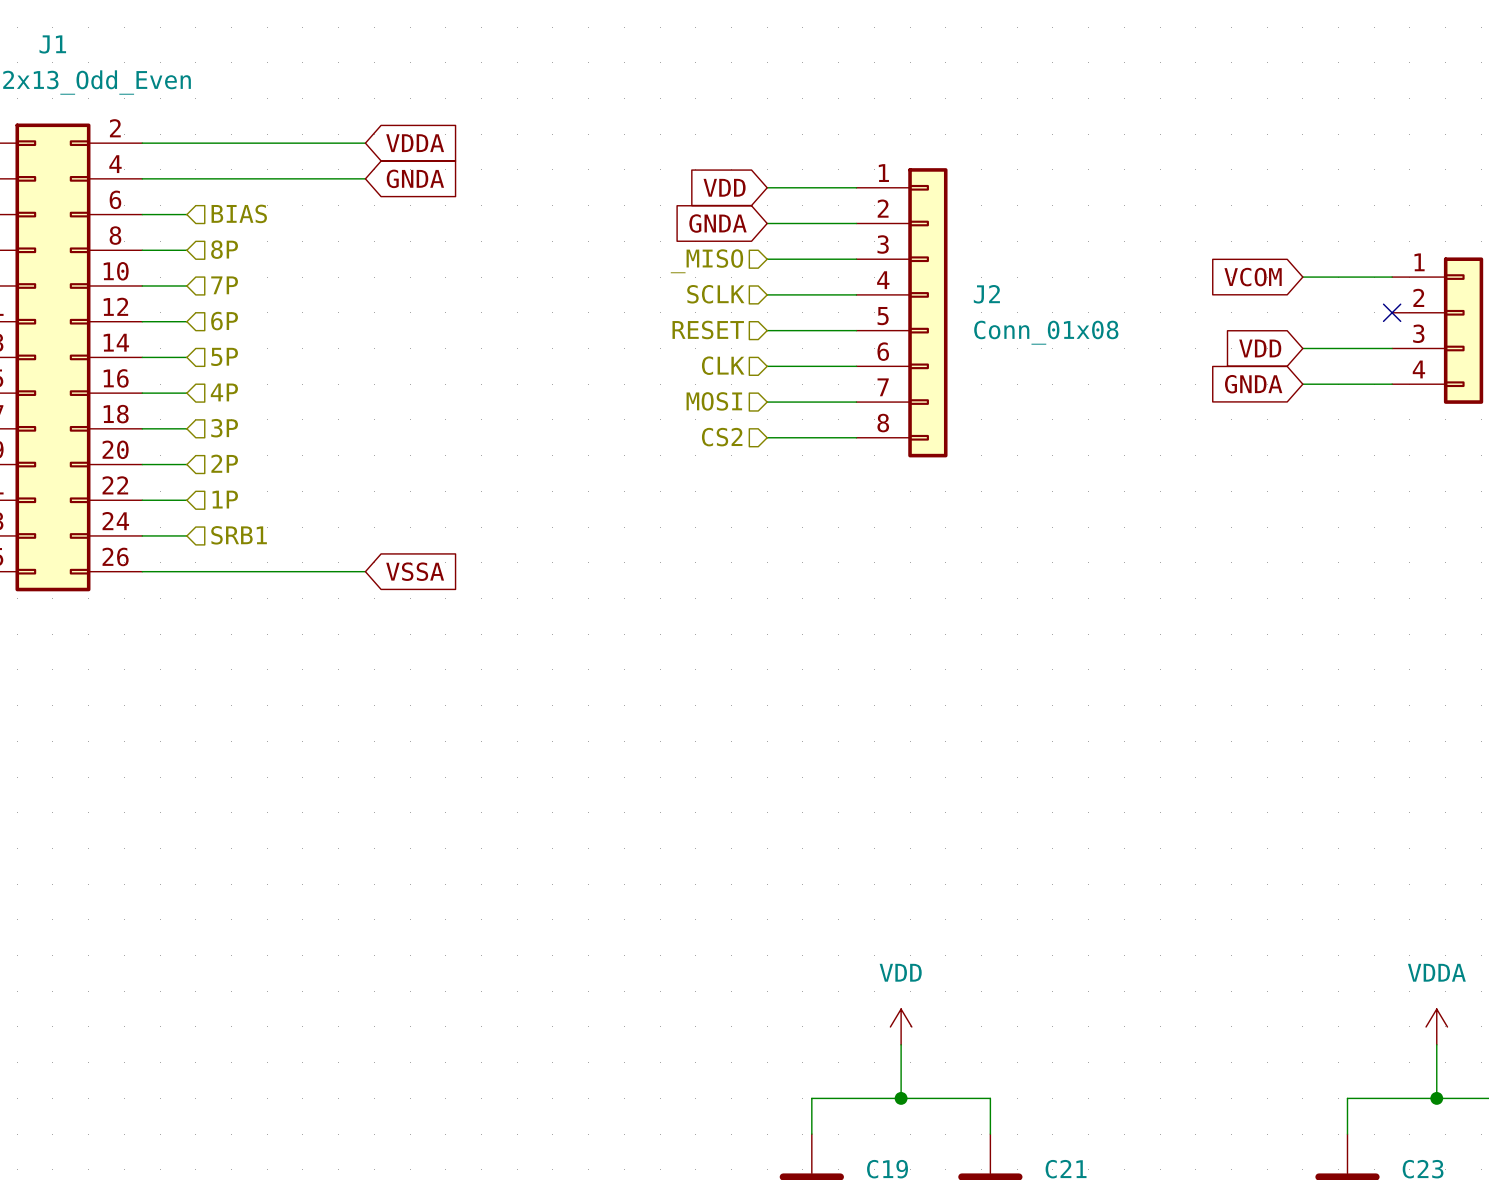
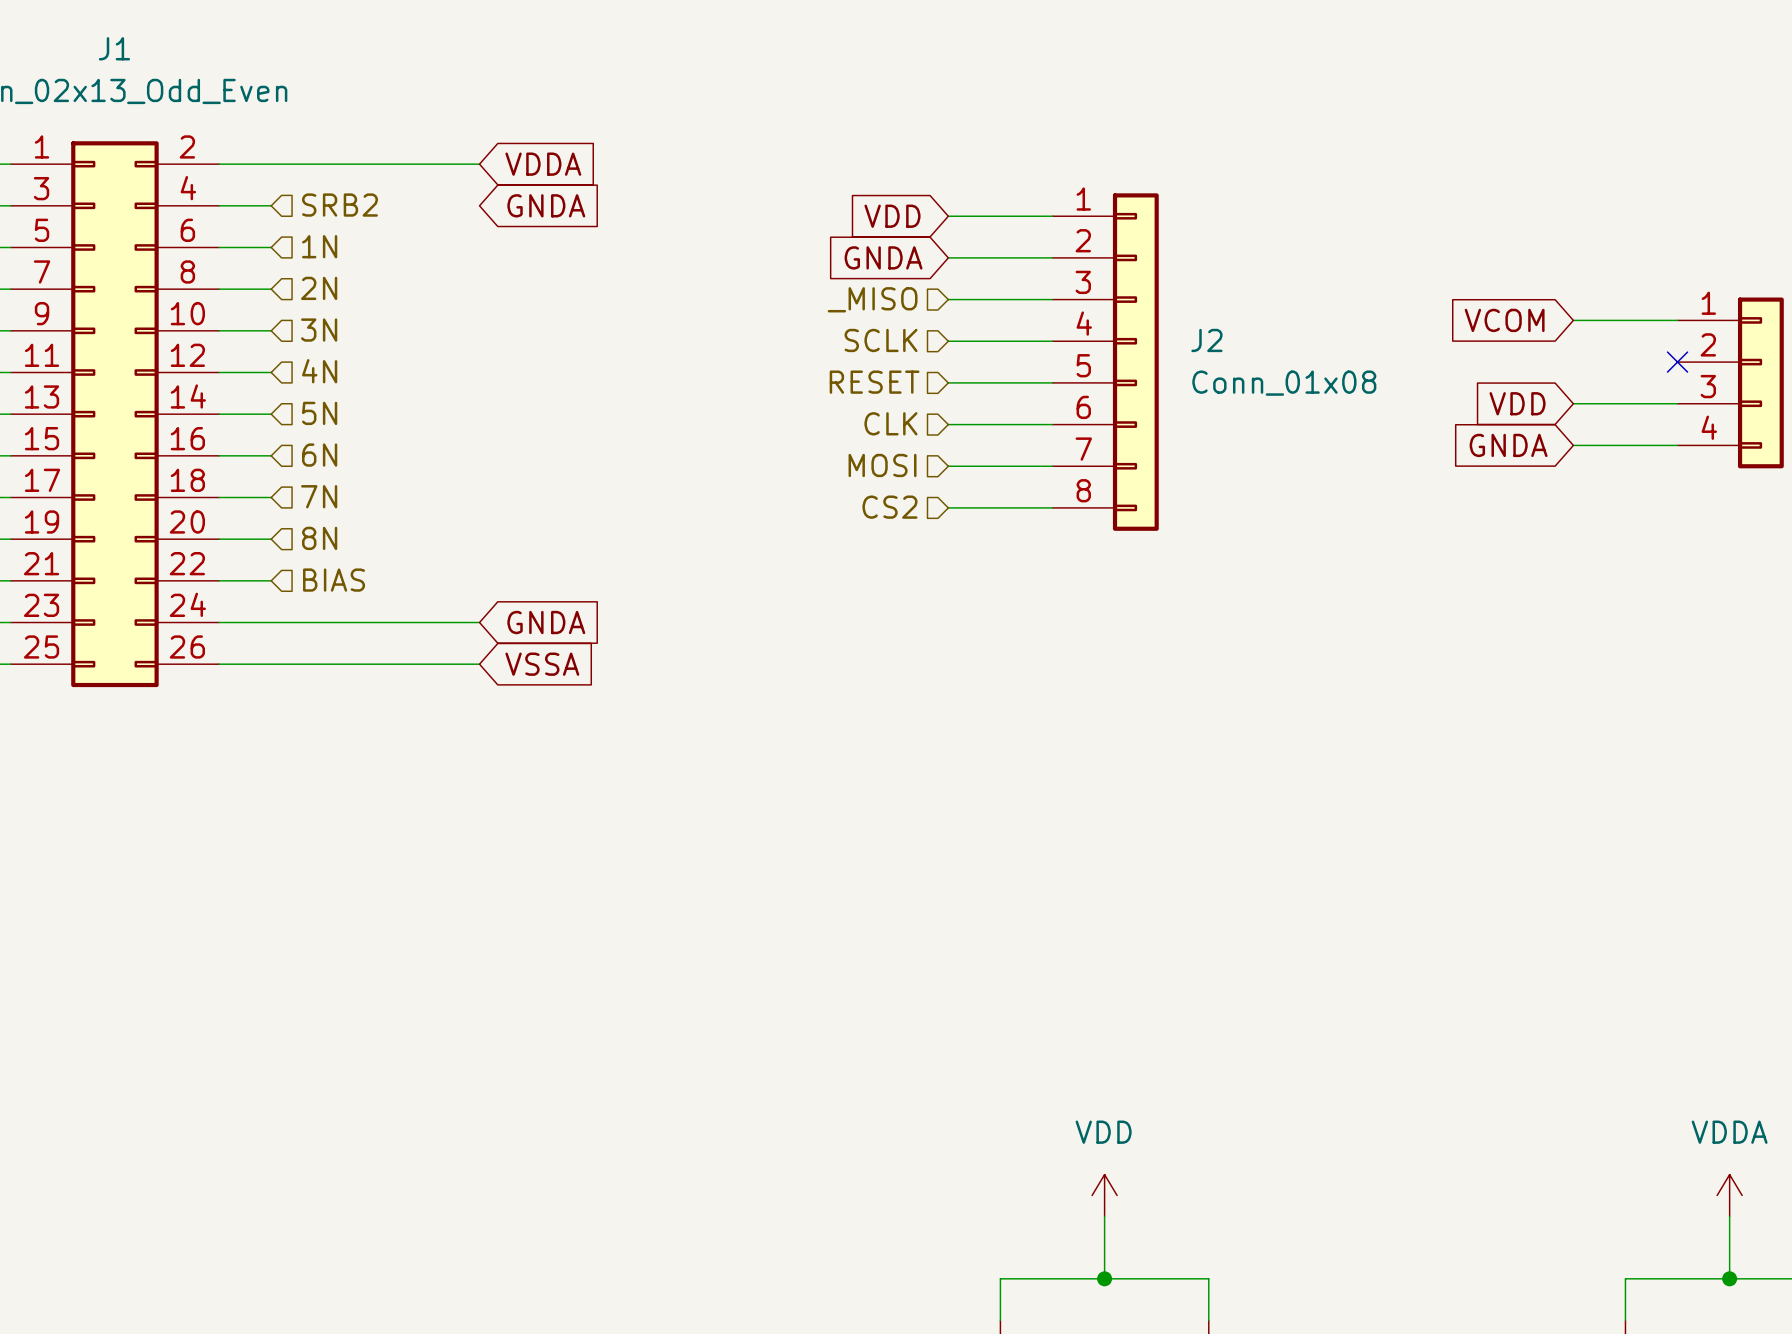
wire: (186, 178) (365, 178) -> none
hierarchical label: none -> SRB2 (339, 205)
hierarchical label: BIAS (239, 213) -> 1N (319, 246)
hierarchical label: 8P (224, 249) -> 2N (319, 288)
hierarchical label: 7P (224, 285) -> 3N (319, 330)
hierarchical label: 6P (224, 321) -> 4N (319, 371)
hierarchical label: 5P (224, 356) -> 5N (319, 413)
hierarchical label: 4P (224, 392) -> 6N (319, 455)
hierarchical label: 3P (224, 428) -> 7N (319, 496)
hierarchical label: 2P (224, 463) -> 8N (319, 538)
hierarchical label: 1P (225, 499) -> BIAS (334, 580)
wire: none -> (271, 622) (479, 622)
hierarchical label: SRB1 (239, 535) -> none
global label: none -> GNDA (546, 622)

